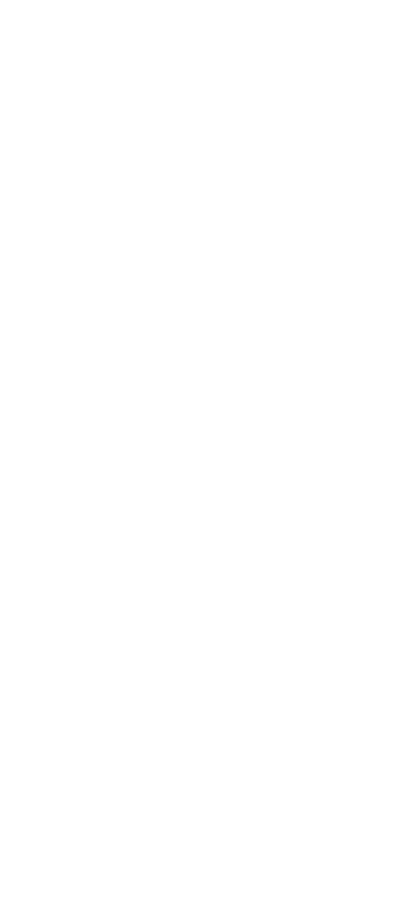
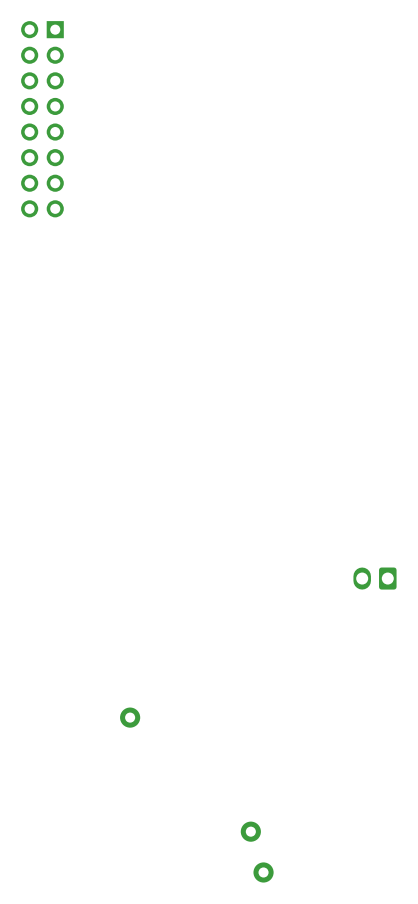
part: none -> (42, 119)
part: none -> (374, 578)
part: none -> (130, 717)
part: none -> (250, 831)
part: none -> (263, 872)

